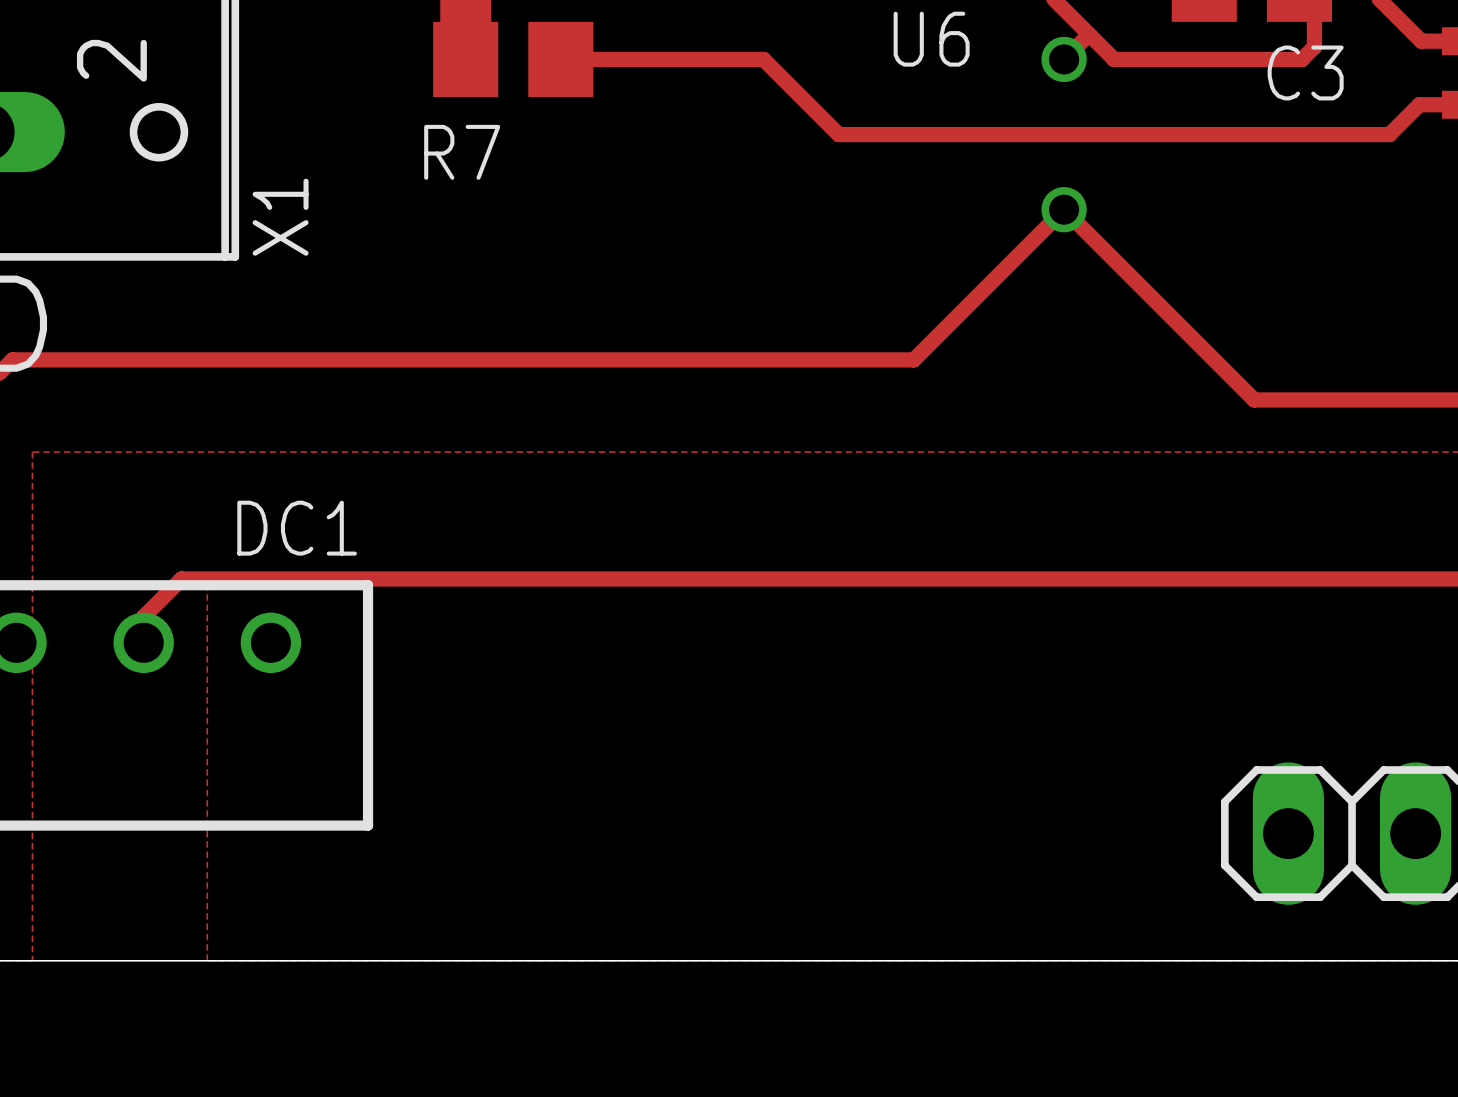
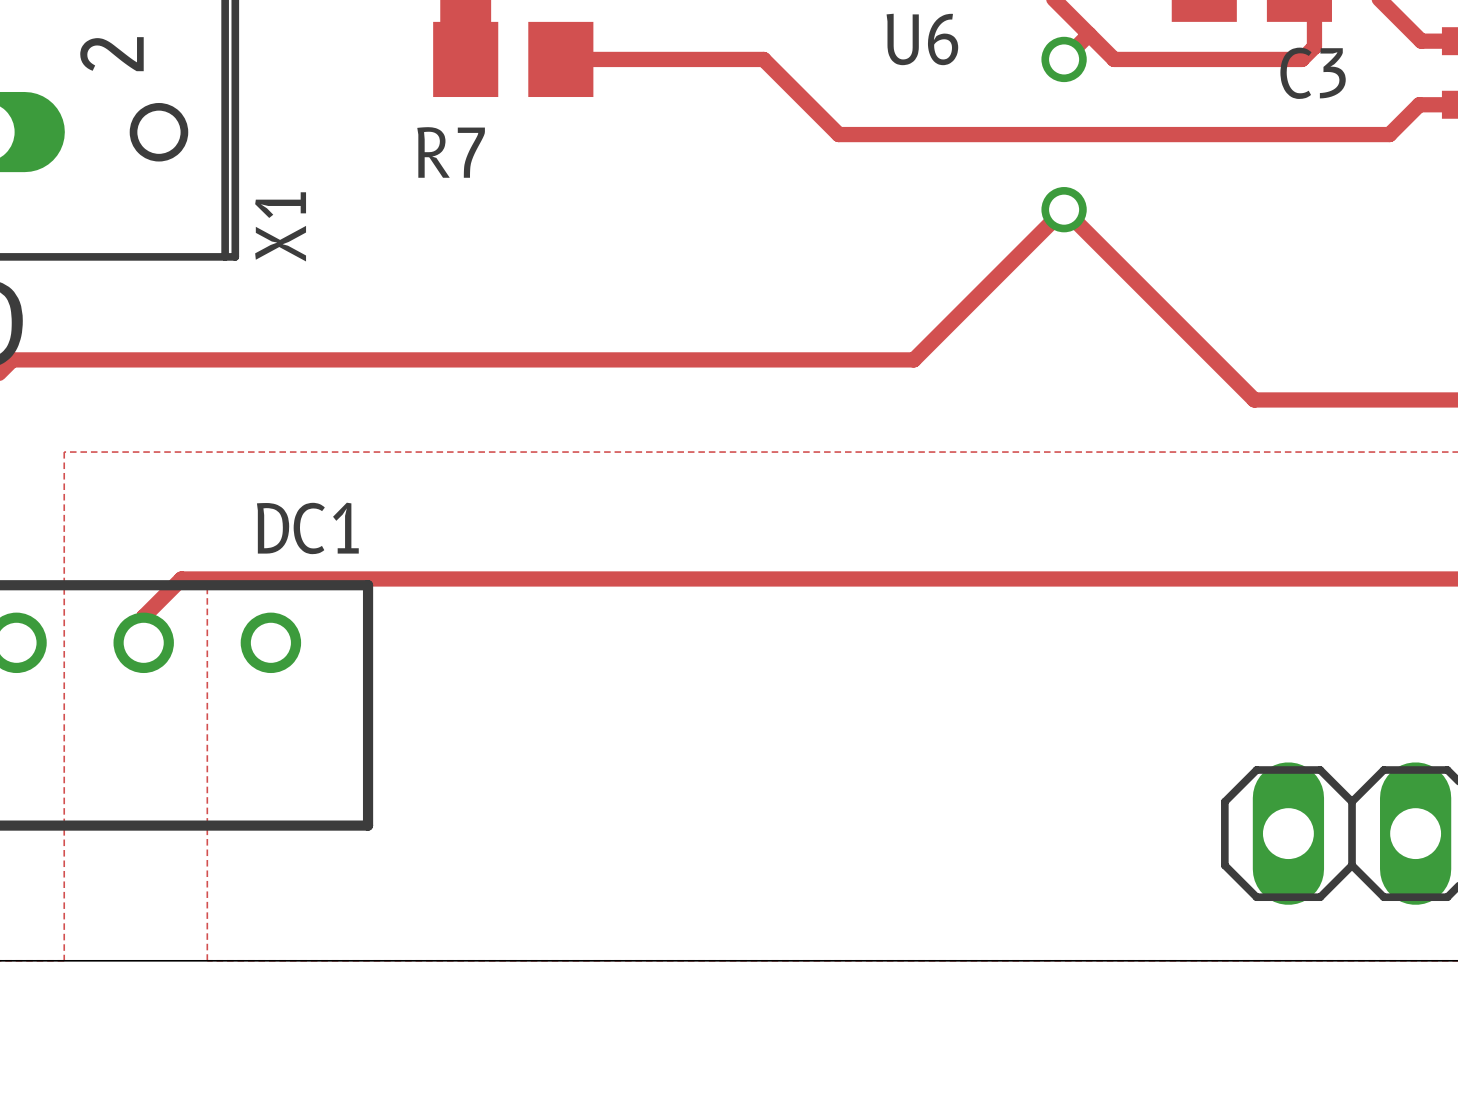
zone outline: (64, 452) (32, 452) (32, 960) -> (64, 452) (64, 960) (32, 960)

